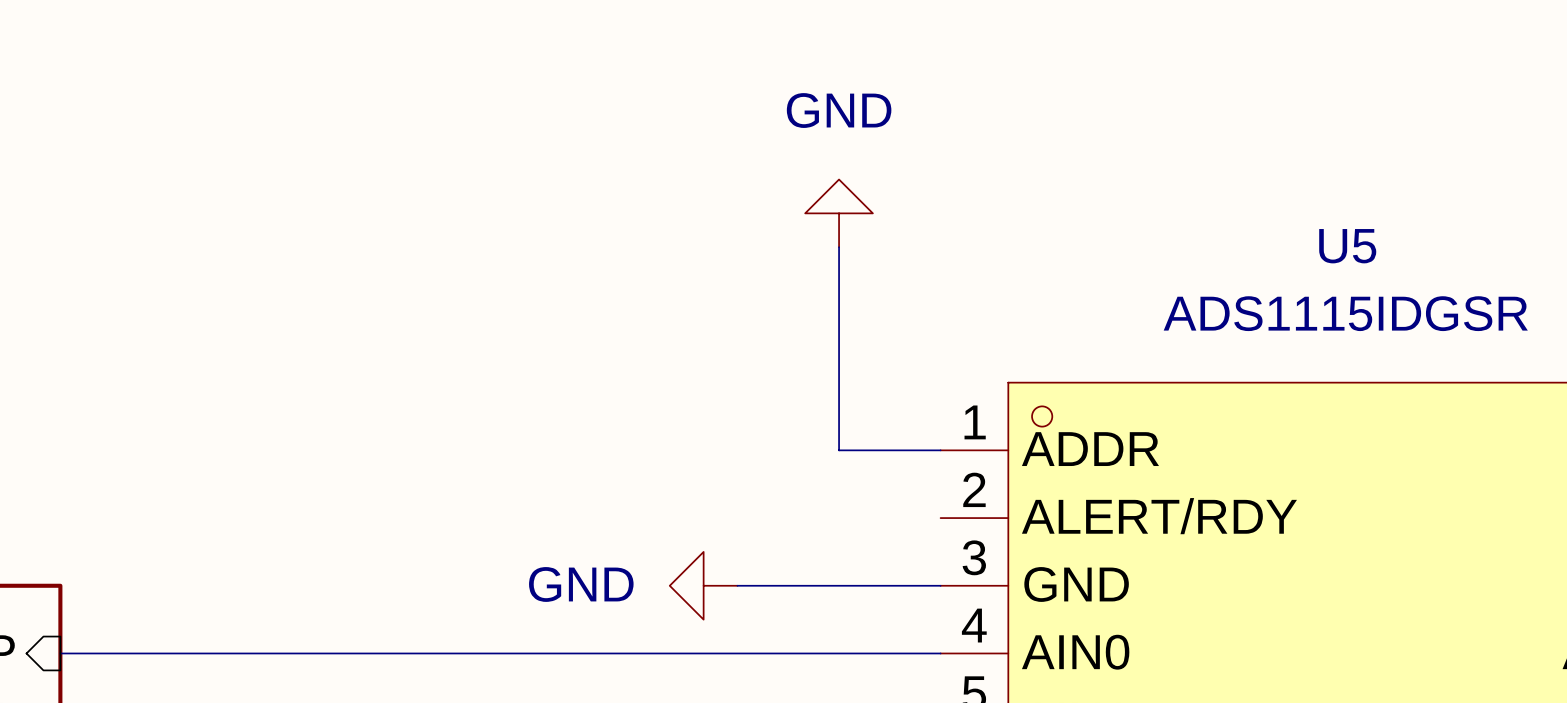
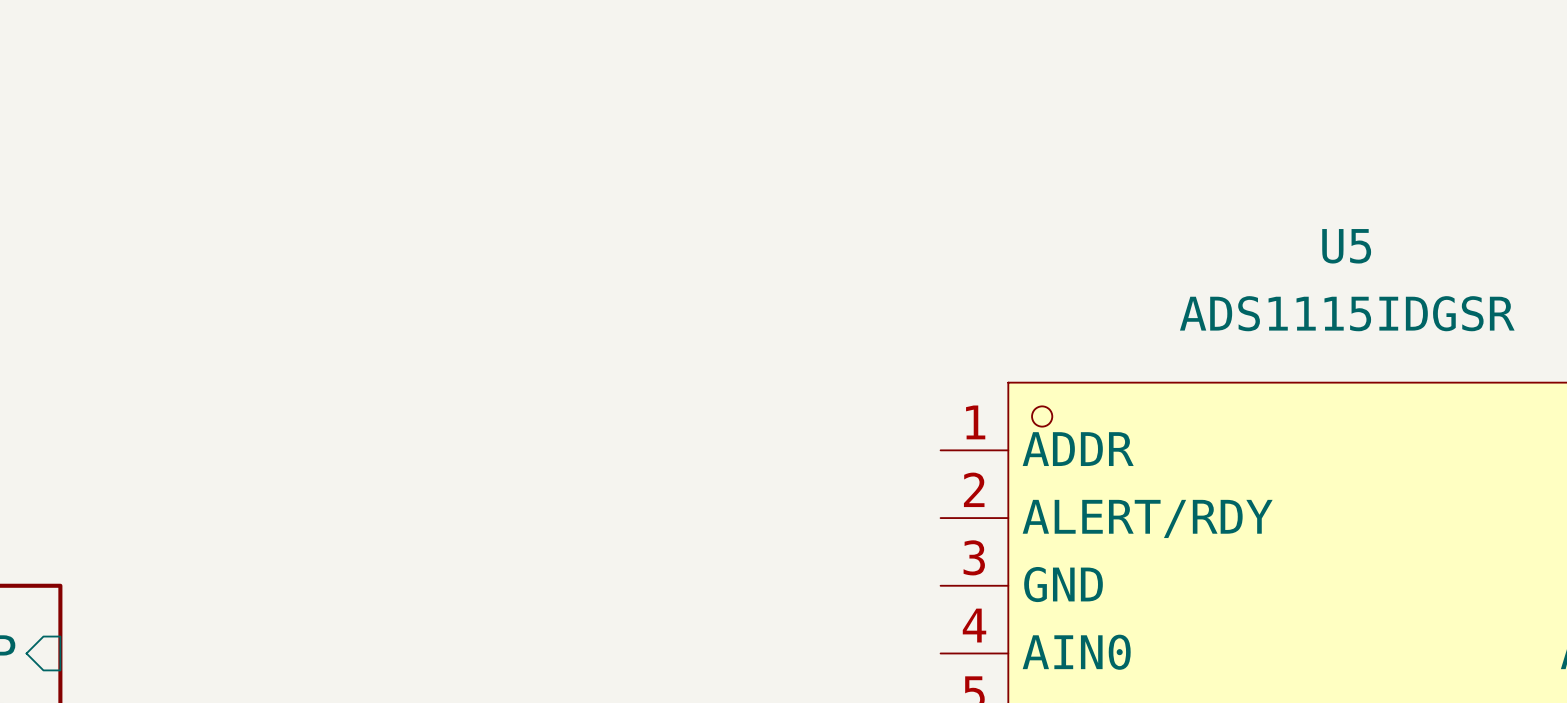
power symbol: GND (839, 213) -> none
wire: (839, 247) (839, 450) (940, 450) -> none
power symbol: GND (703, 585) -> none
wire: (737, 585) (940, 585) -> none
wire: (60, 653) (940, 653) -> none

